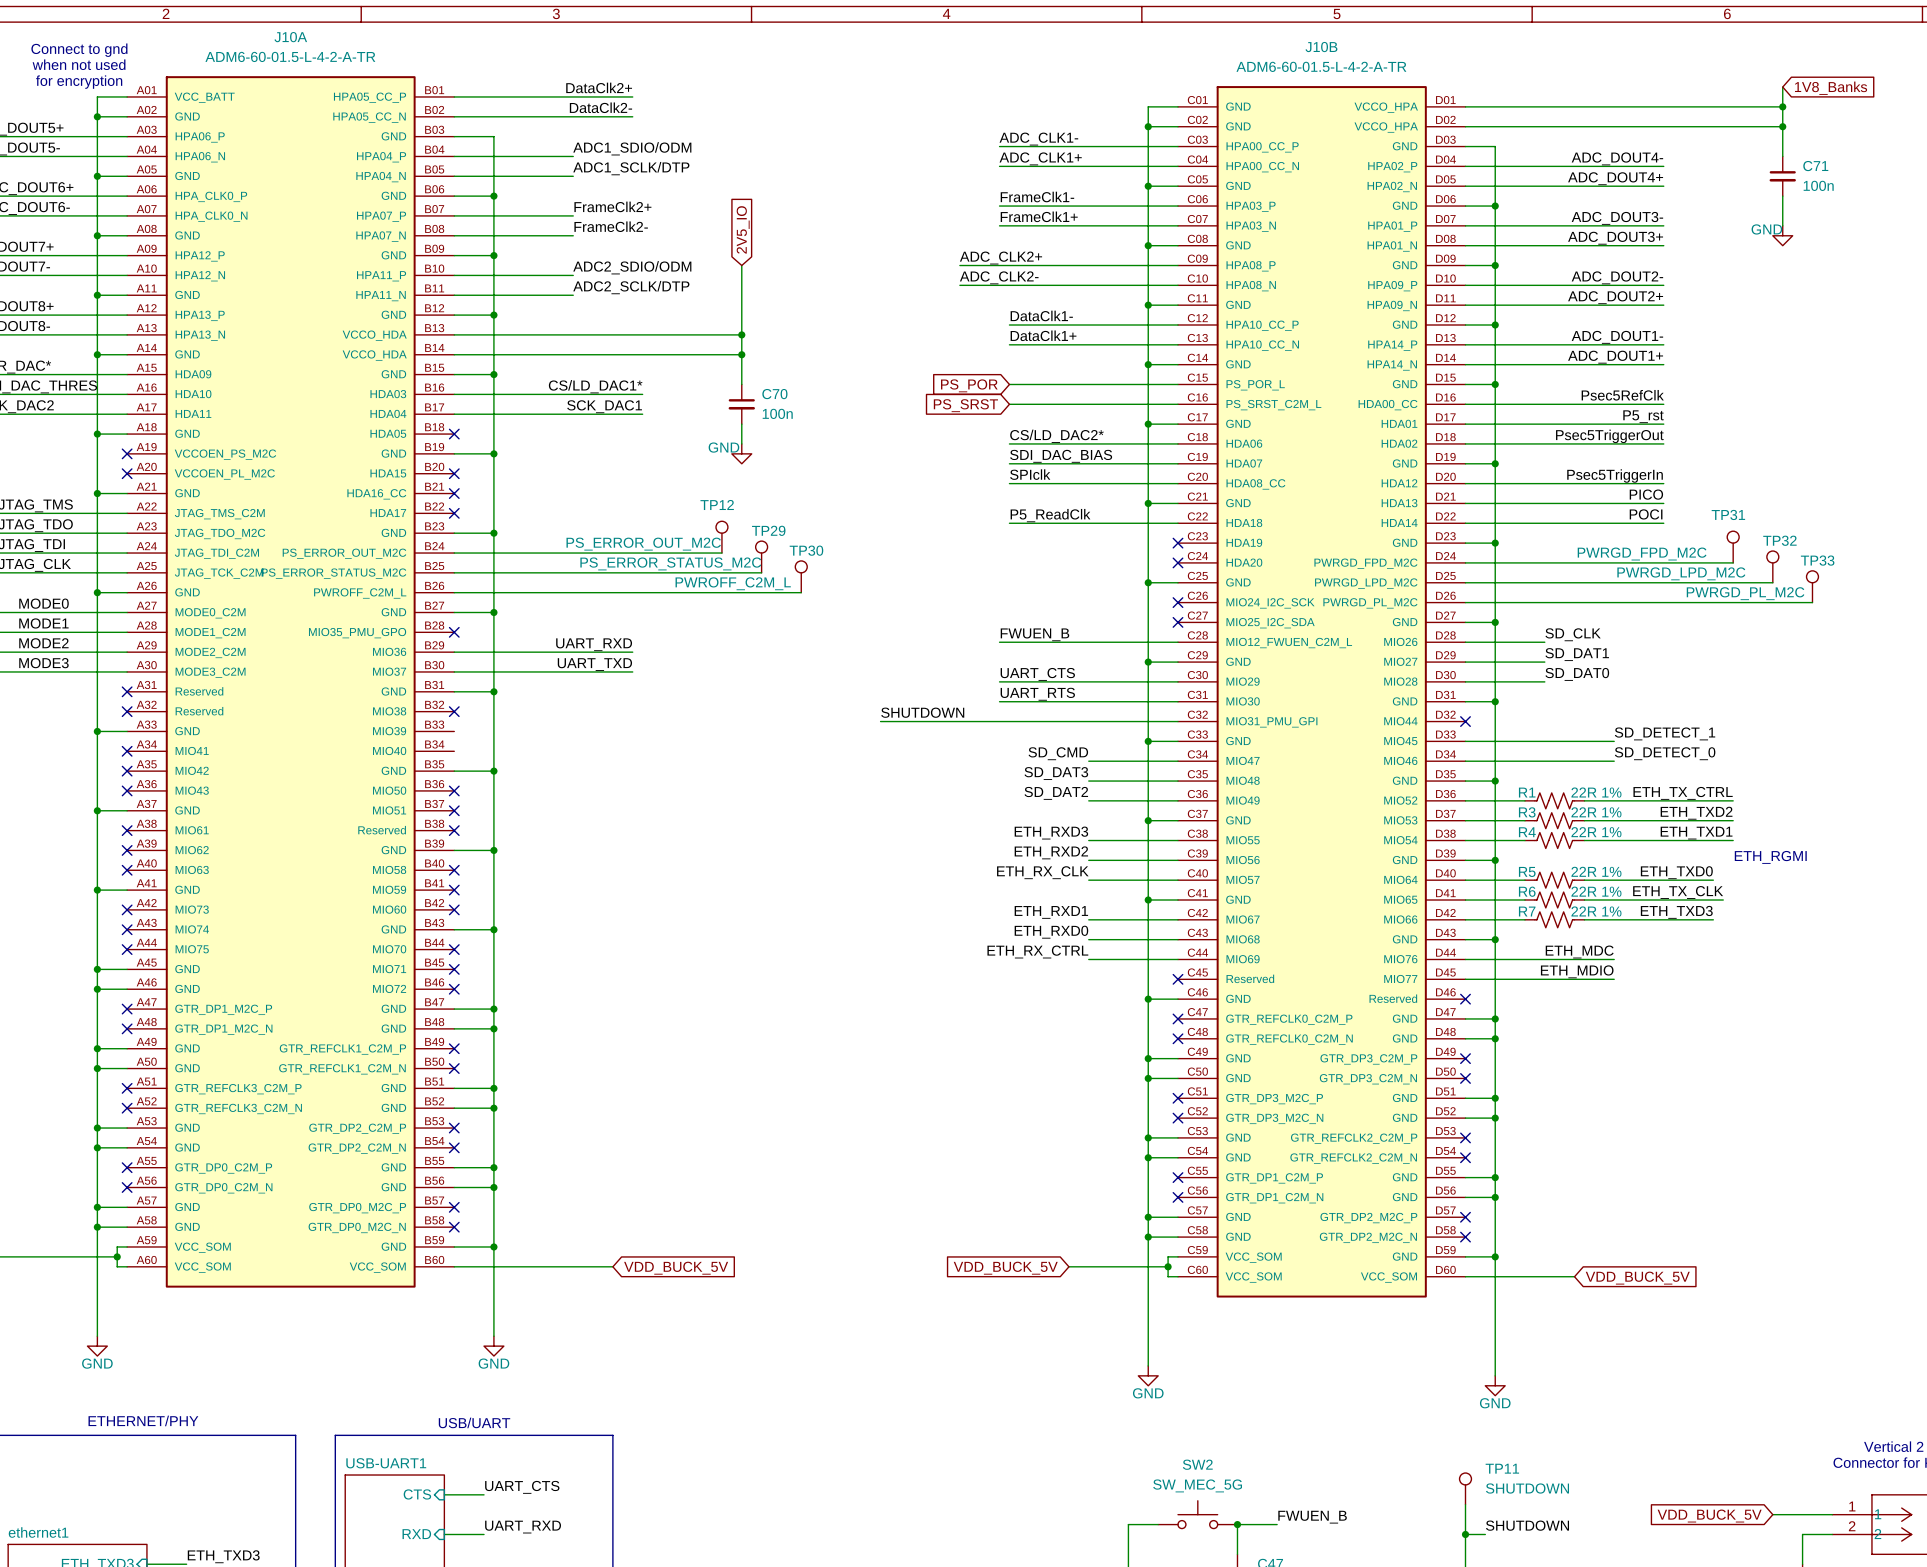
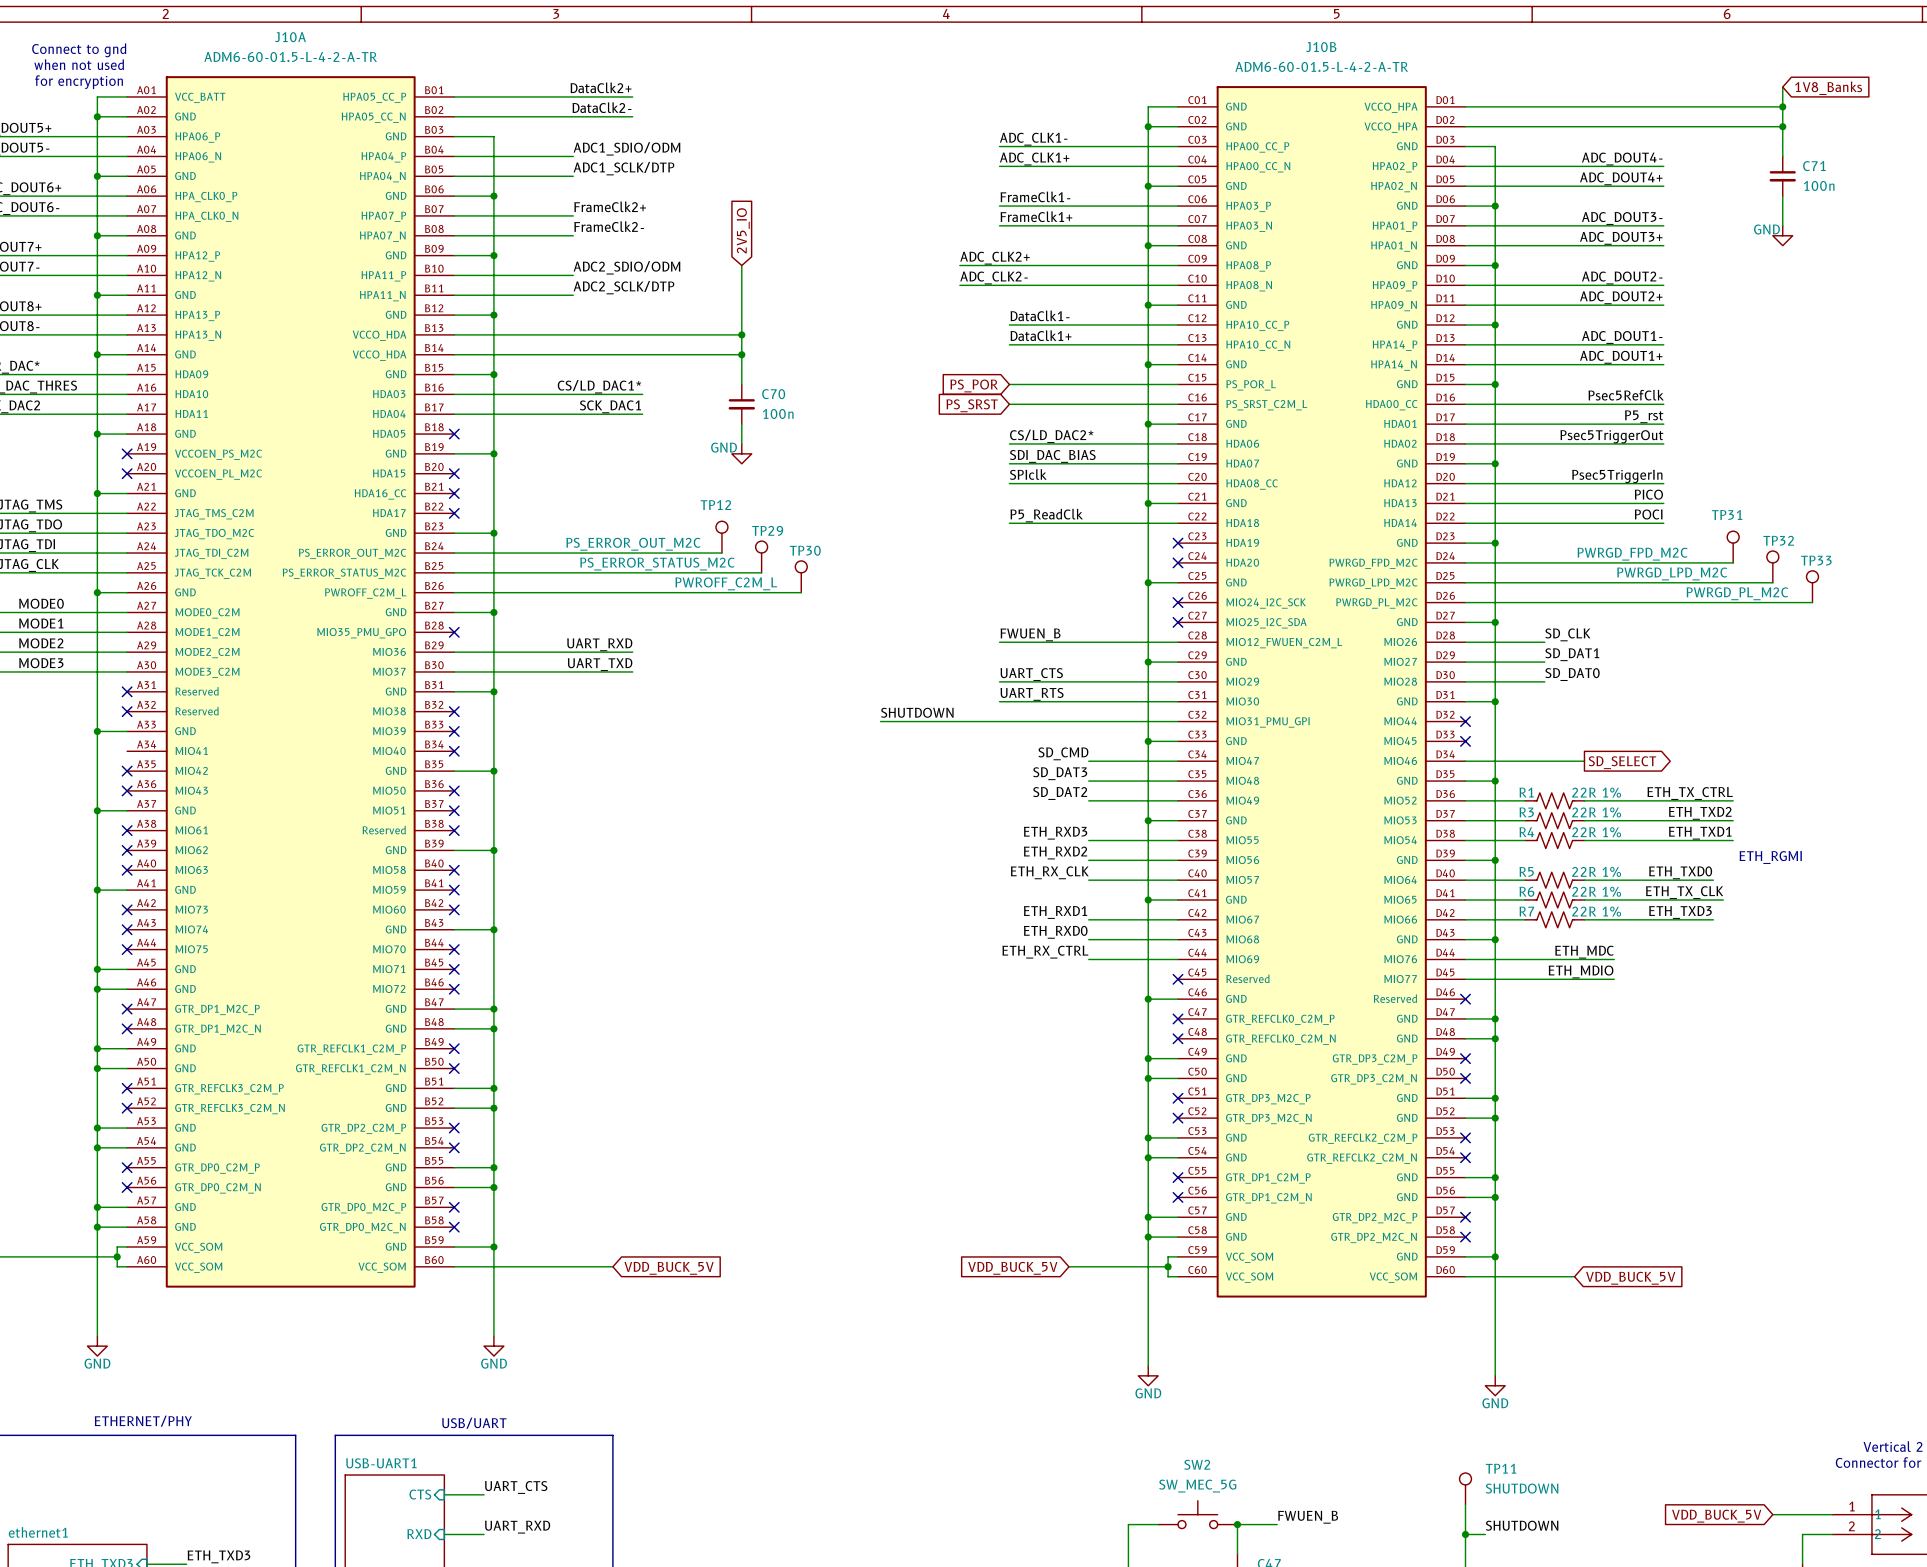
no-connect mark: none -> (454, 731)
label: SD_DETECT_1 (1665, 733) -> none
wire: (1465, 741) (1614, 741) -> none
no-connect mark: none -> (1465, 741)
no-connect mark: (127, 751) -> none
no-connect mark: none -> (454, 751)
label: SD_DETECT_0 (1665, 753) -> none
wire: (1584, 761) (1614, 761) -> none
global label: none -> SD_SELECT (1622, 762)

